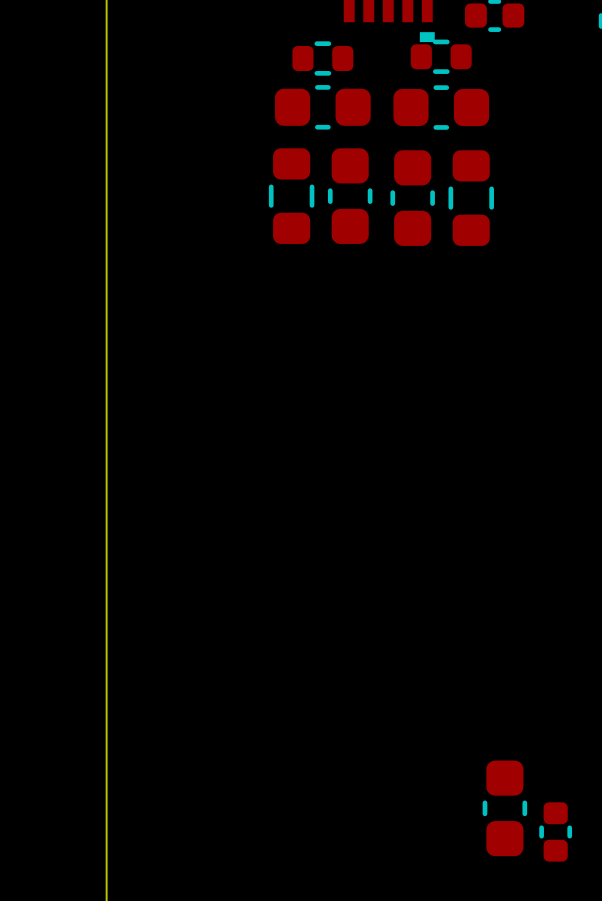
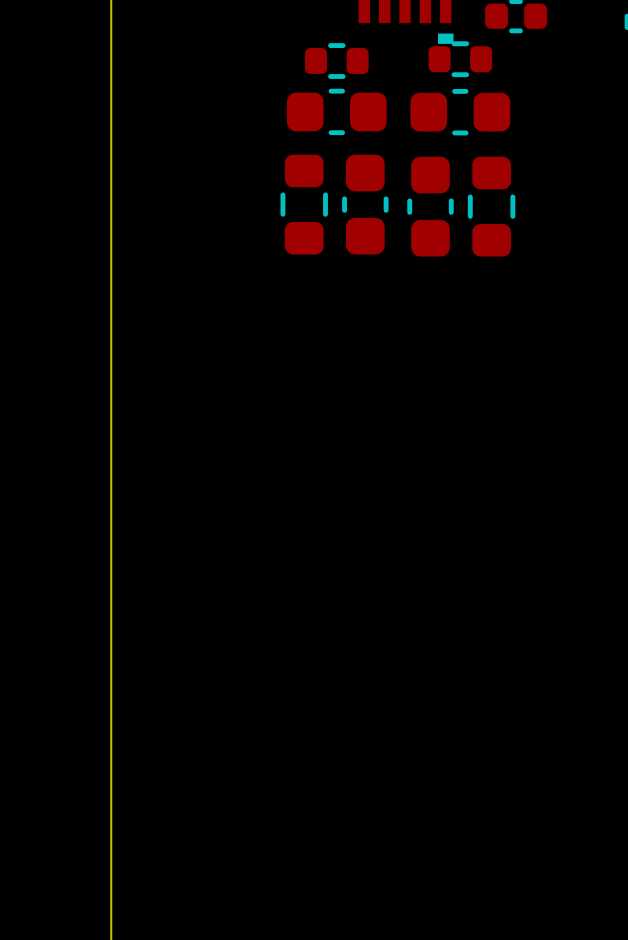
part: (504, 808) -> none
part: (555, 831) -> none

